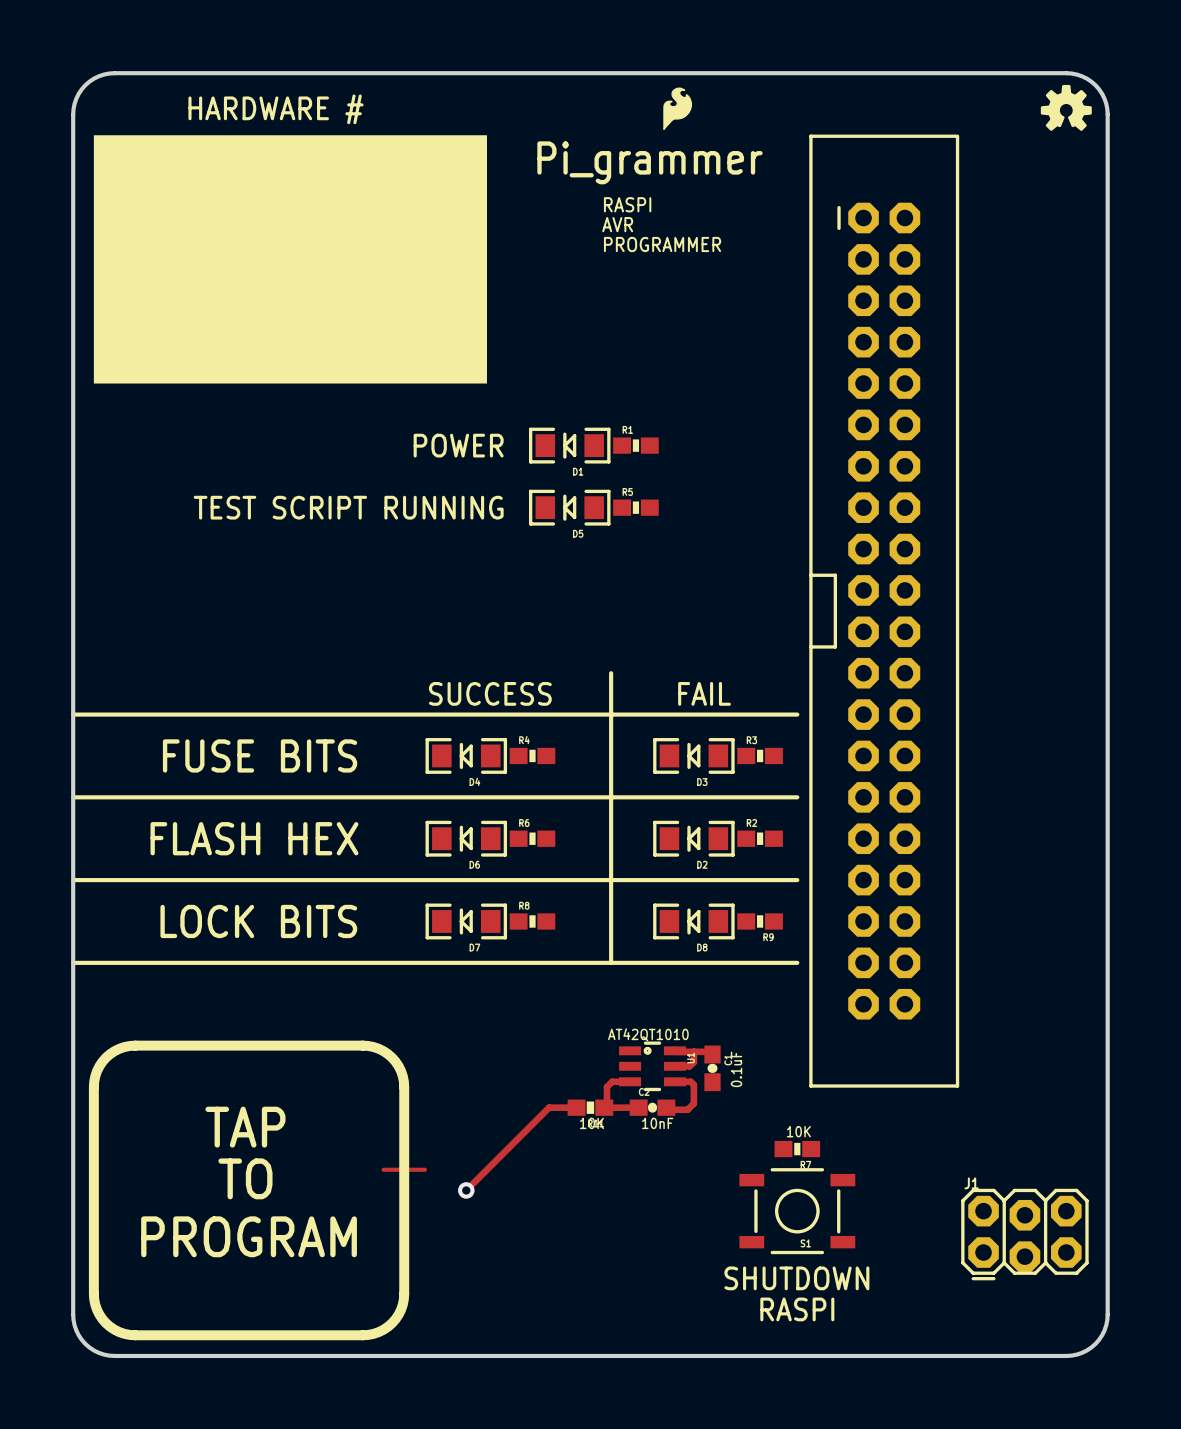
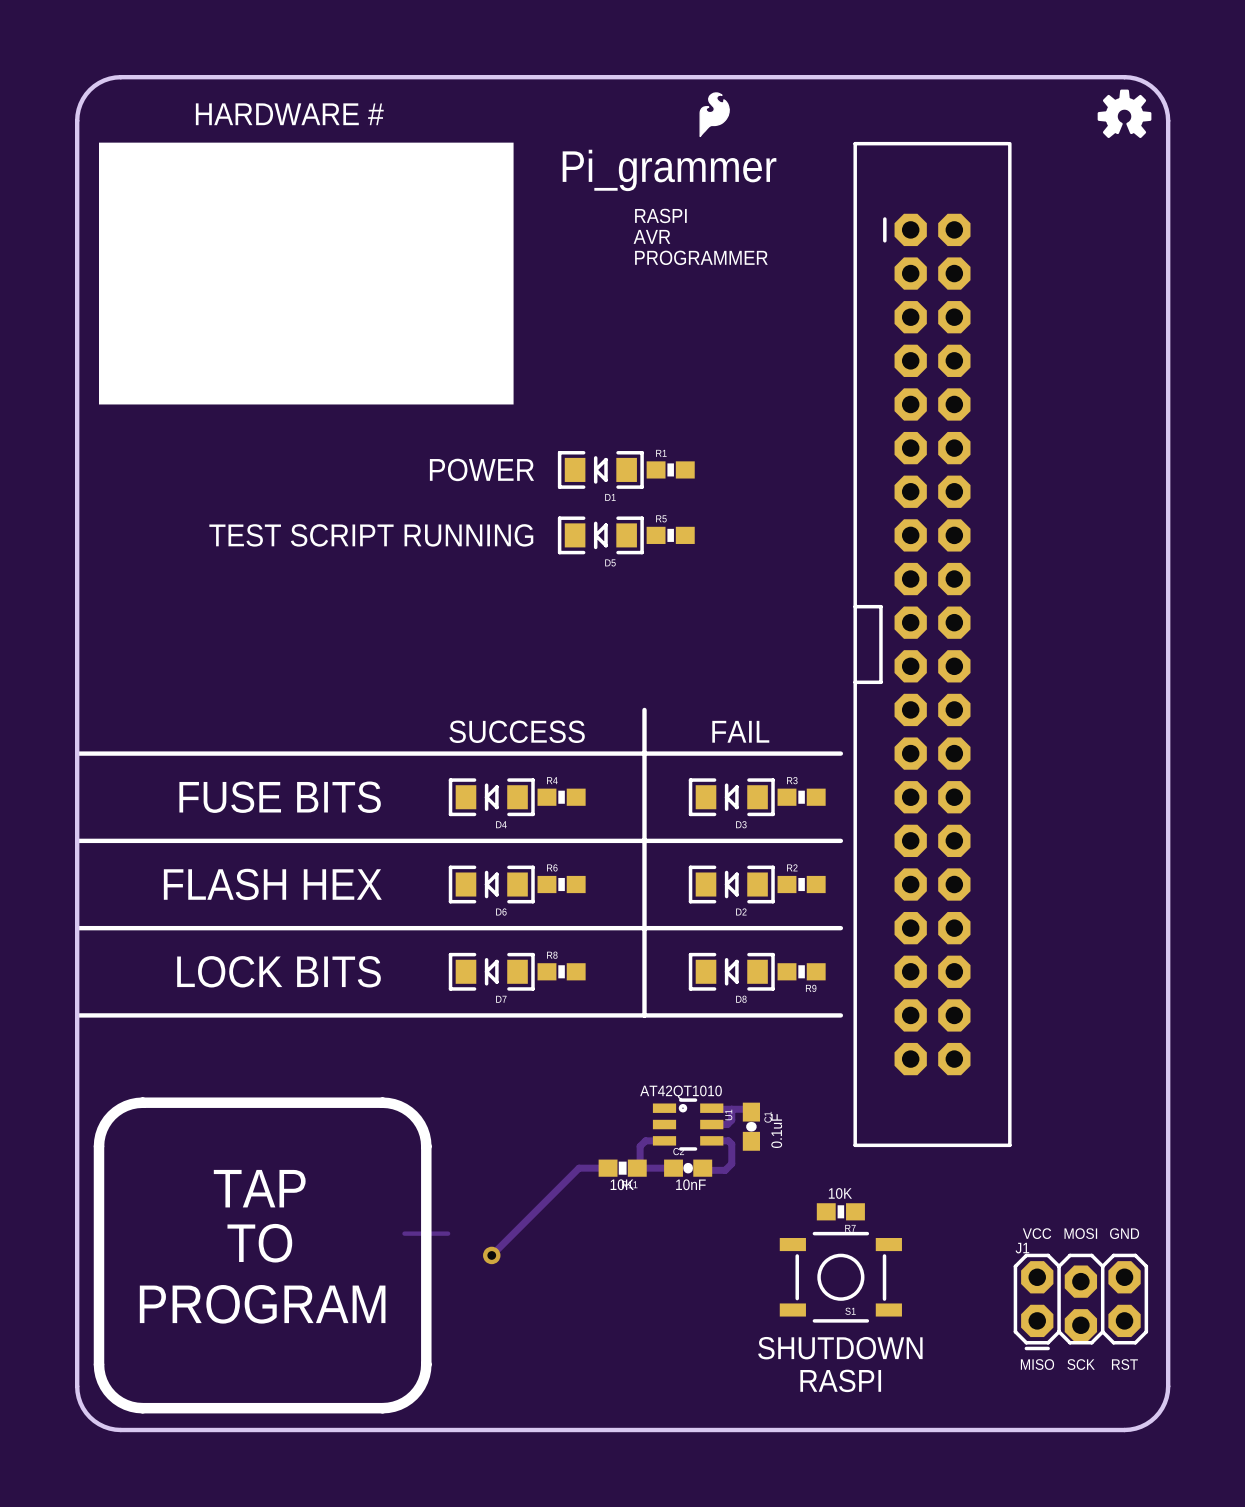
text: none -> VCC (1037, 1233)
text: none -> MOSI (1080, 1233)
text: none -> GND (1124, 1233)
text: none -> MISO (1037, 1364)
text: none -> SCK (1081, 1364)
text: none -> RST (1124, 1364)

